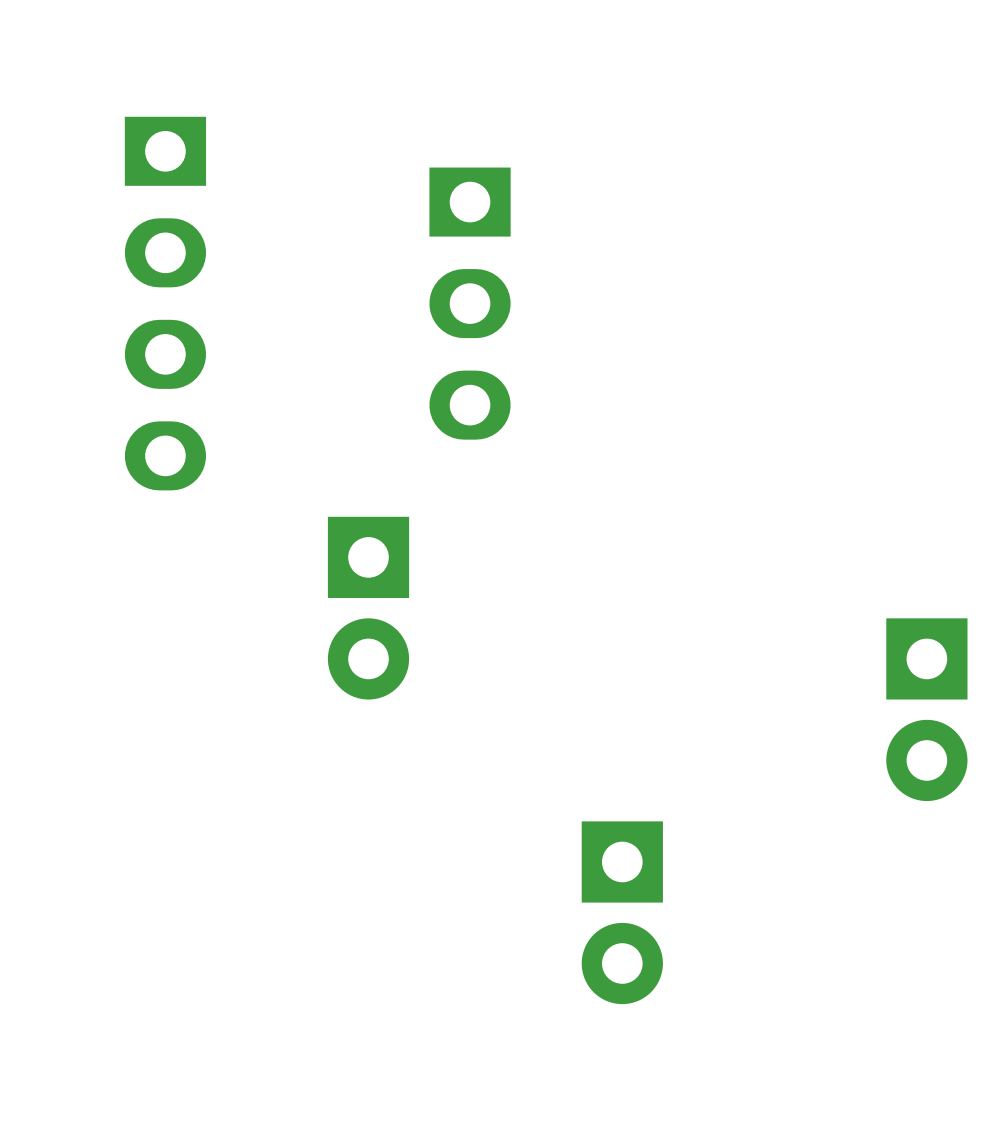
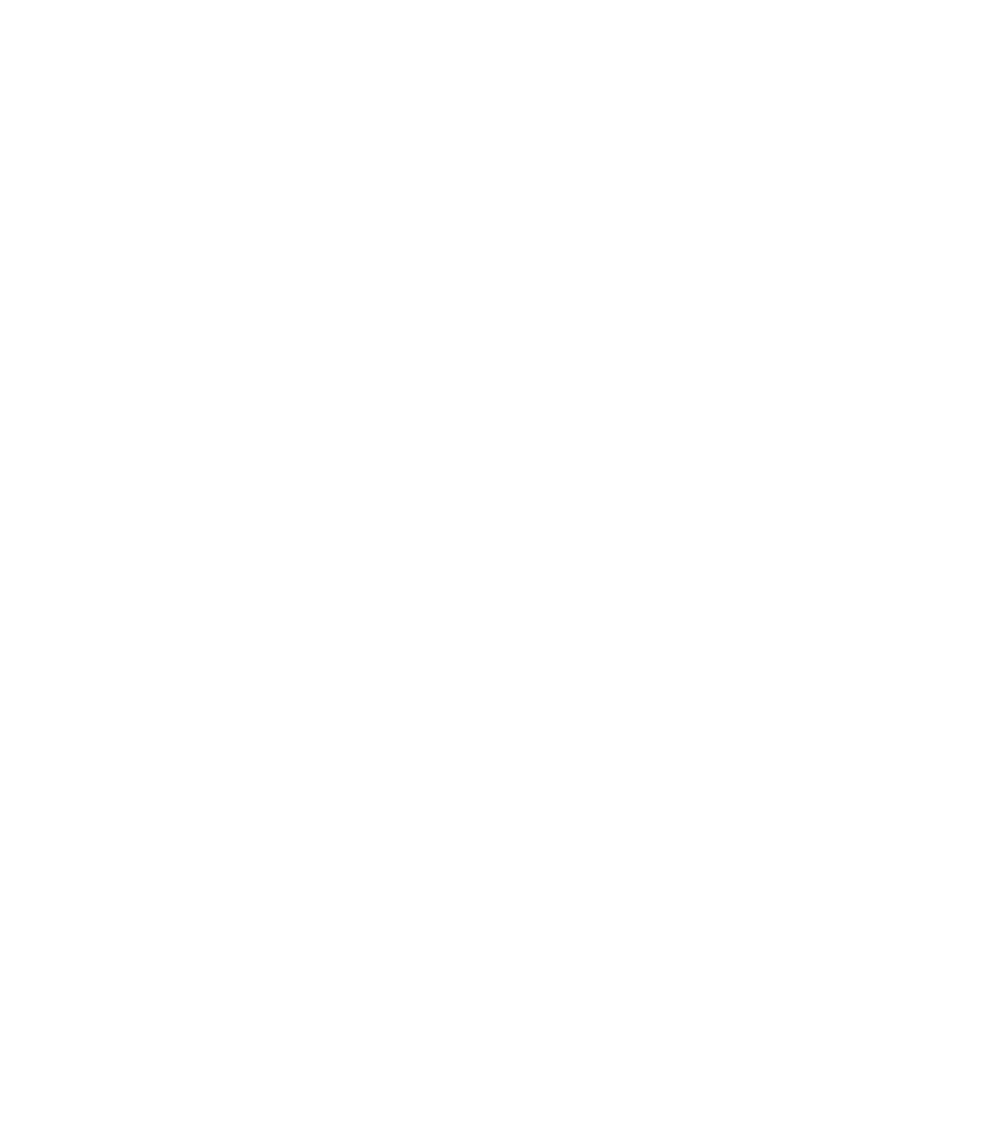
part: (165, 303) -> none
part: (470, 303) -> none
part: (368, 608) -> none
part: (926, 709) -> none
part: (622, 912) -> none

